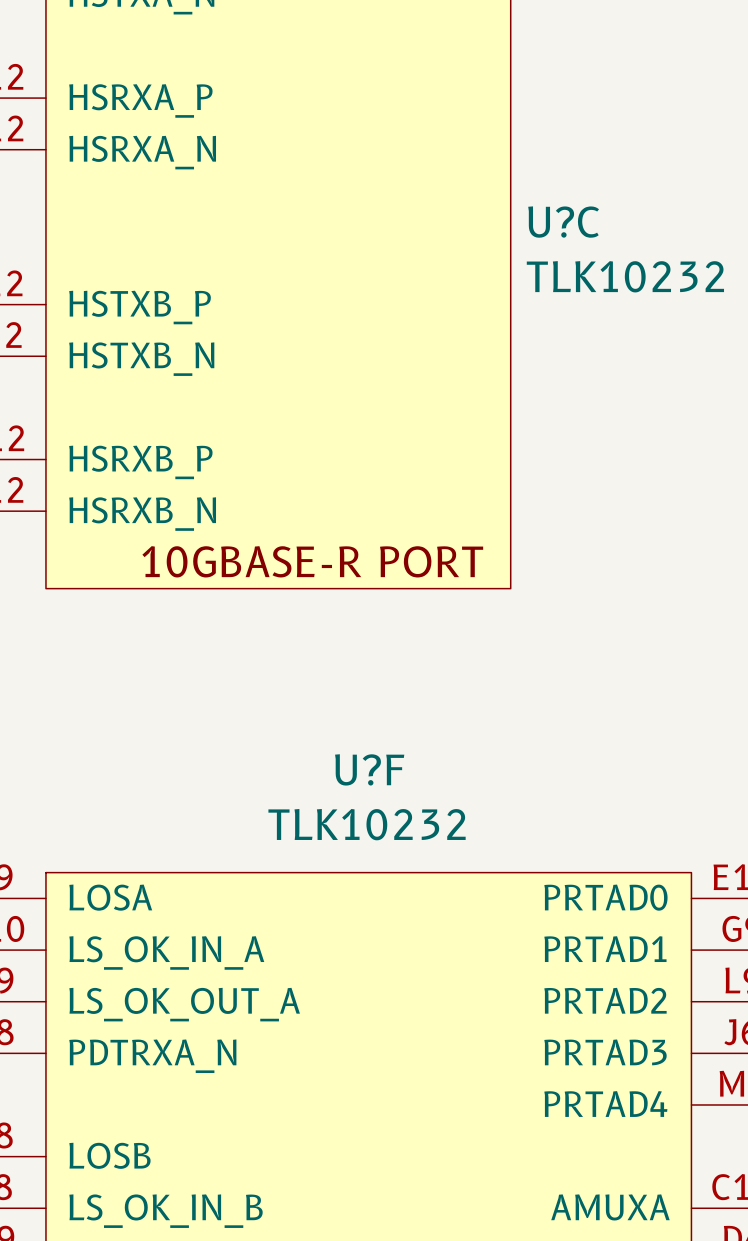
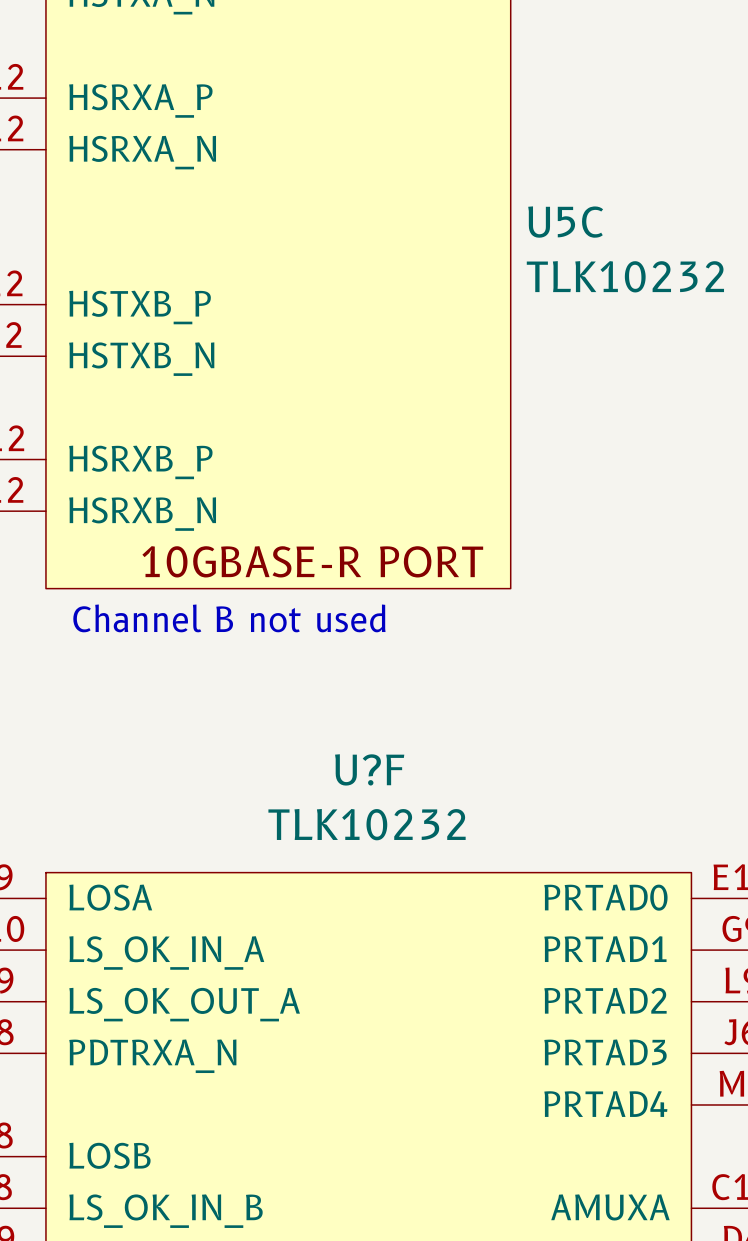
U?C name: U?C (563, 222) -> U5C (565, 222)
text: none -> Channel B not used (229, 618)

